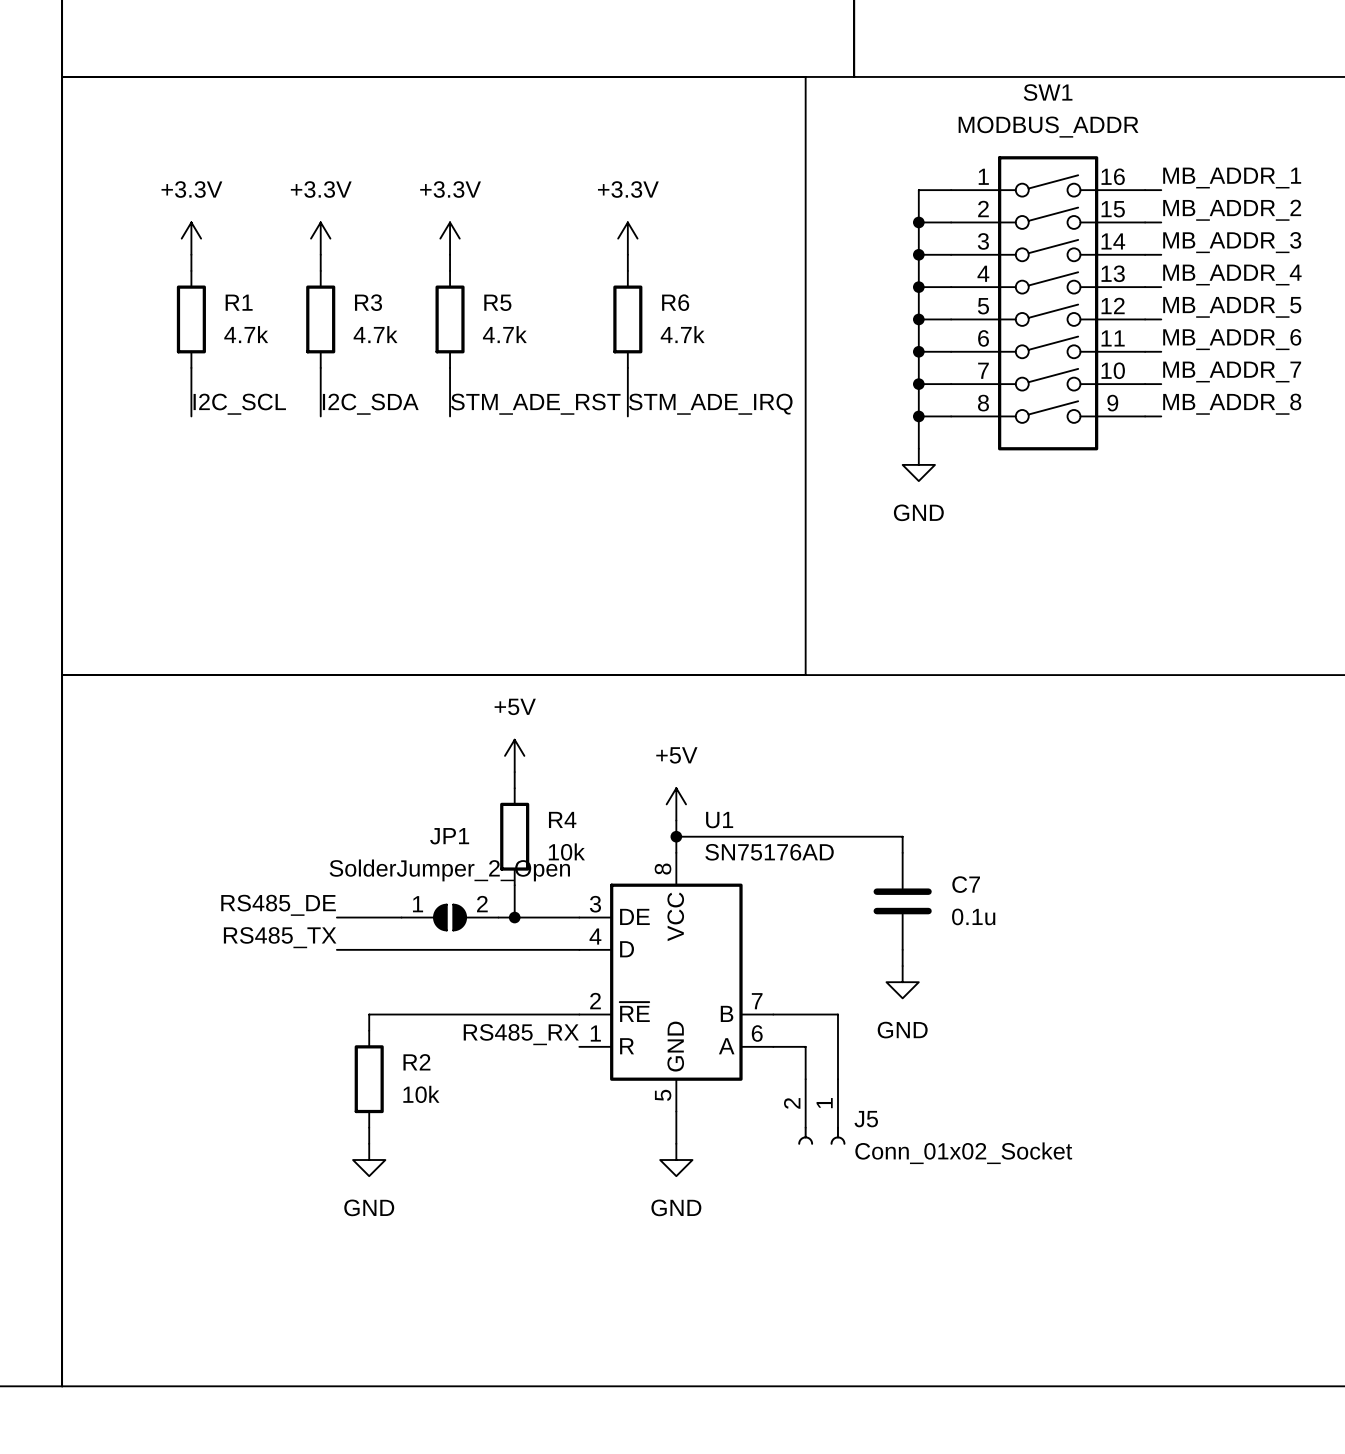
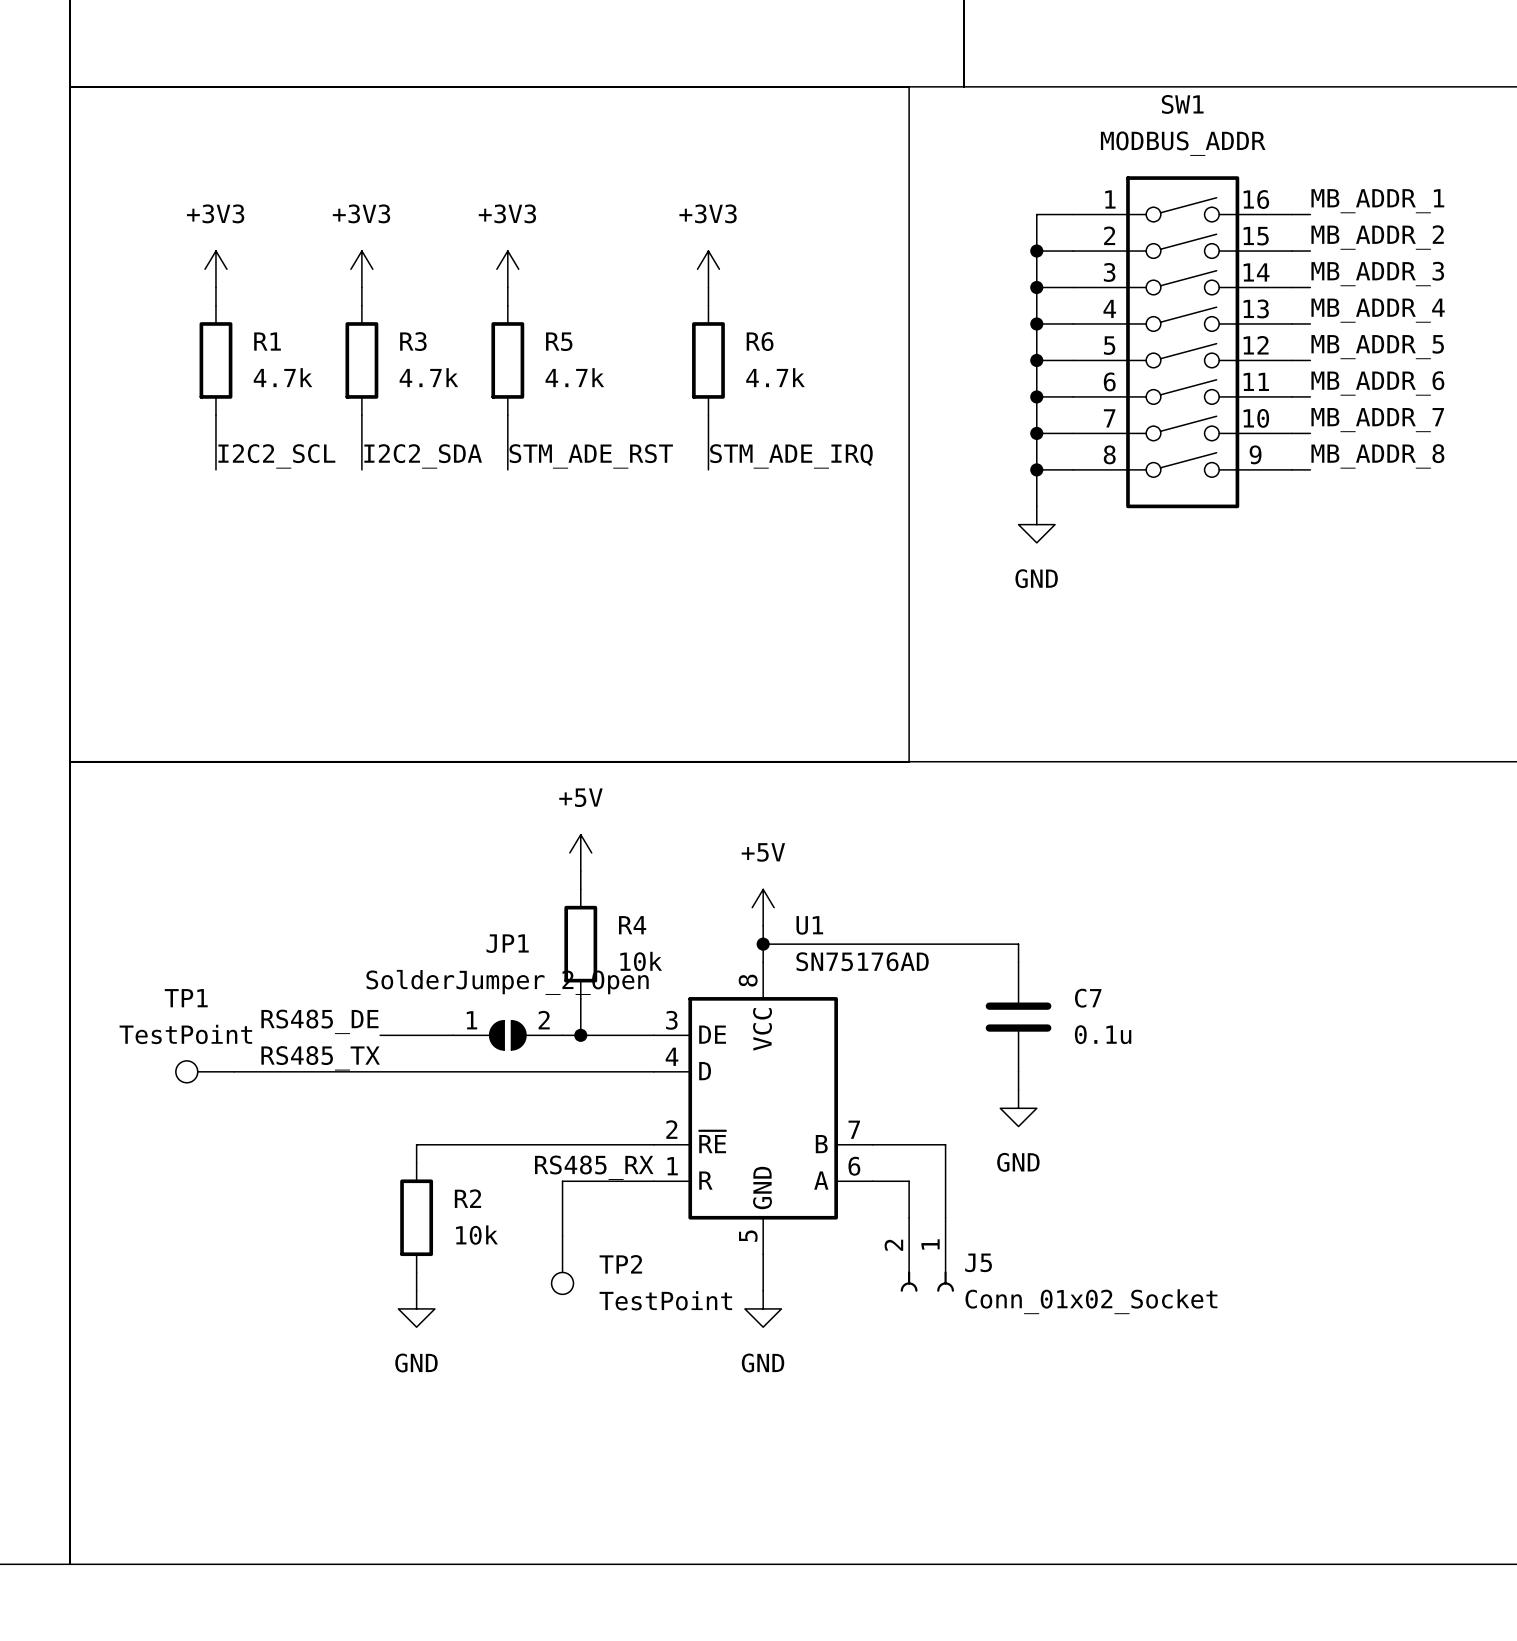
power symbol: +3.3V (191, 238) -> +3V3 (215, 269)
power symbol: +3.3V (320, 238) -> +3V3 (361, 269)
power symbol: +3.3V (450, 238) -> +3V3 (507, 269)
power symbol: +3.3V (627, 238) -> +3V3 (708, 269)
label: I2C_SCL (239, 404) -> I2C2_SCL (276, 456)
label: I2C_SDA (370, 404) -> I2C2_SDA (423, 456)
TP1: none -> TestPoint (205, 1071)
wire: none -> (234, 1071) (380, 1071)
wire: none -> (653, 1181) (562, 1181) (562, 1235)
TP2: none -> TestPoint (562, 1265)

